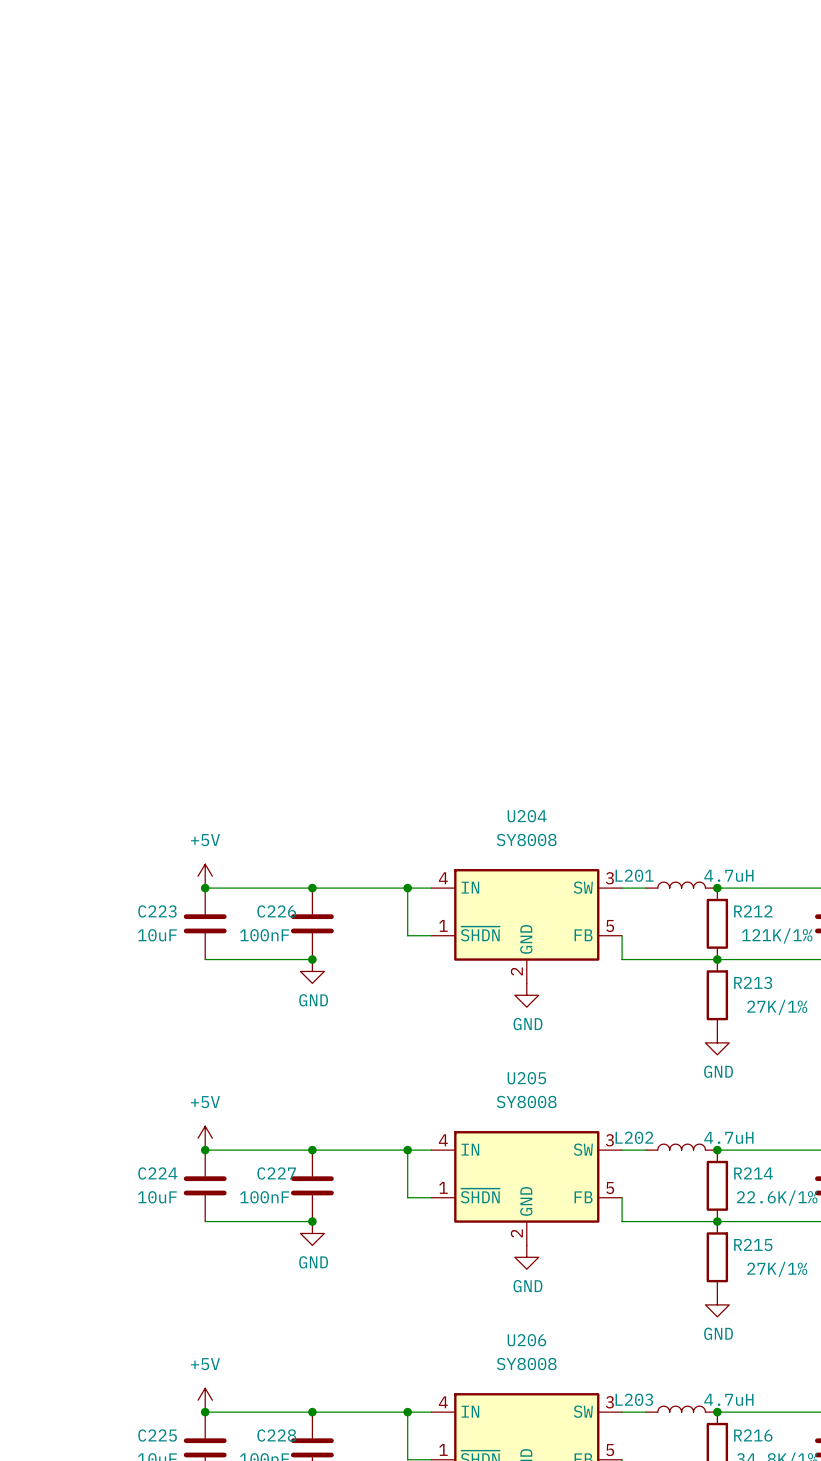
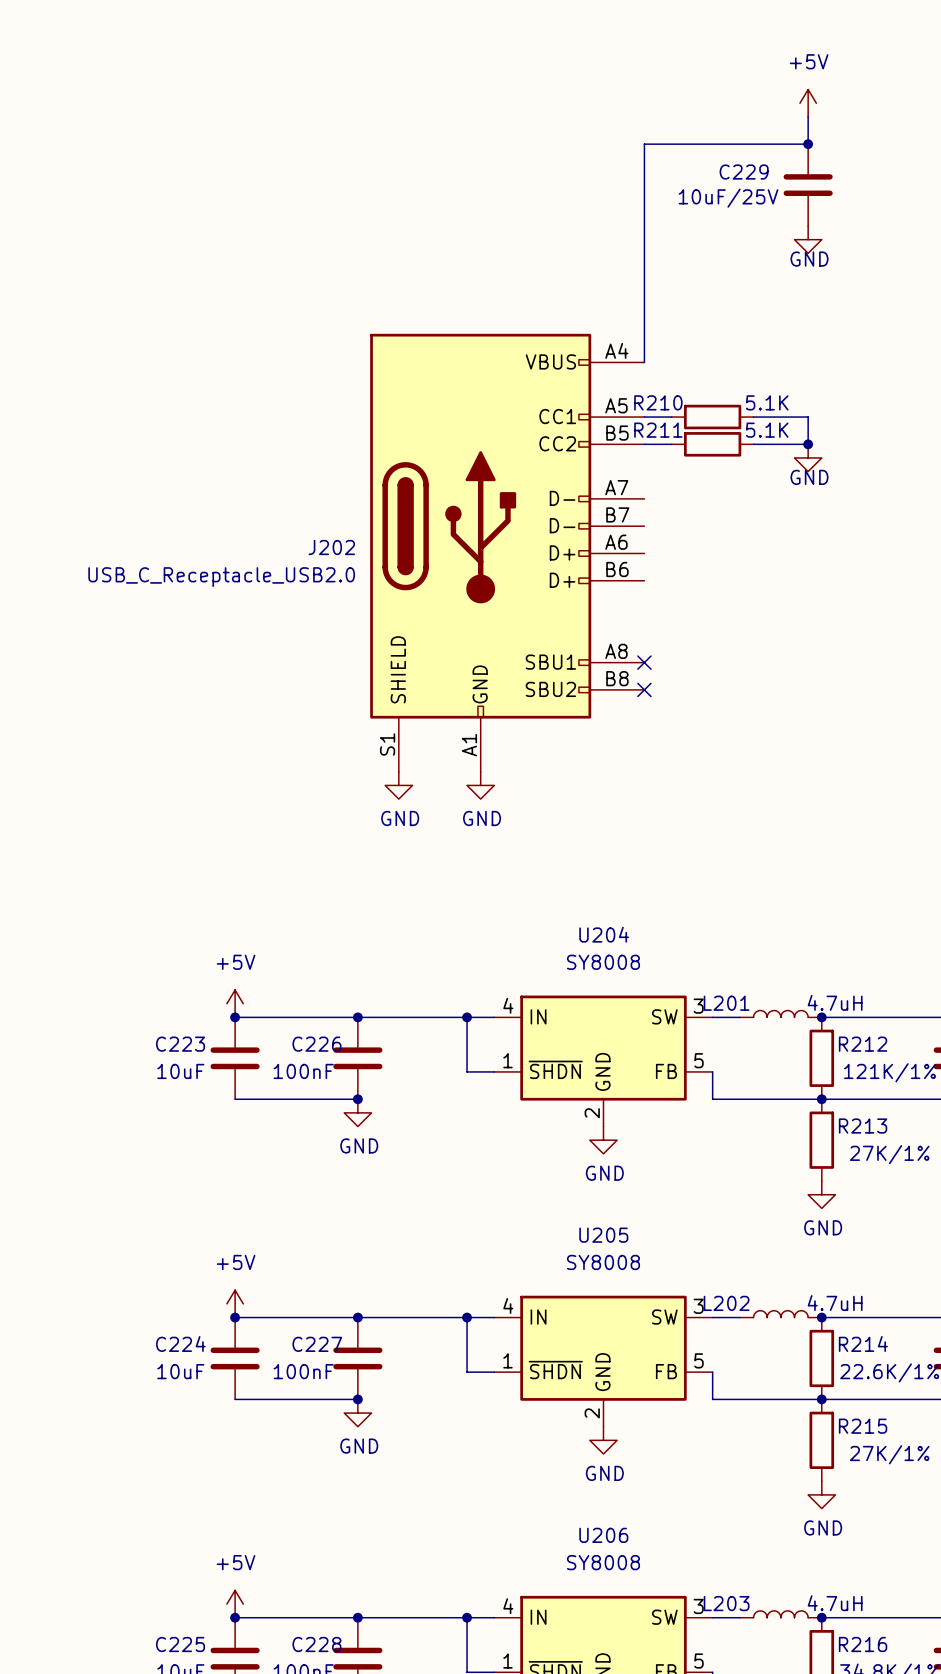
power symbol: none -> +5V (808, 103)
wire: none -> (808, 116) (808, 144) (644, 144) (644, 362)
junction: none -> (808, 144)
C229: none -> 10uF/25V (808, 185)
power symbol: none -> GND (808, 239)
wire: none -> (644, 417) (671, 417)
R210: none -> 5.1K (712, 417)
wire: none -> (753, 417) (808, 417) (808, 444) (753, 444)
wire: none -> (644, 444) (671, 444)
R211: none -> 5.1K (712, 444)
junction: none -> (808, 444)
power symbol: none -> GND (808, 457)
J202: none -> USB_C_Receptacle_USB2.0 (507, 552)
no-connect mark: none -> (644, 662)
no-connect mark: none -> (644, 689)
power symbol: none -> GND (398, 785)
power symbol: none -> GND (480, 785)

